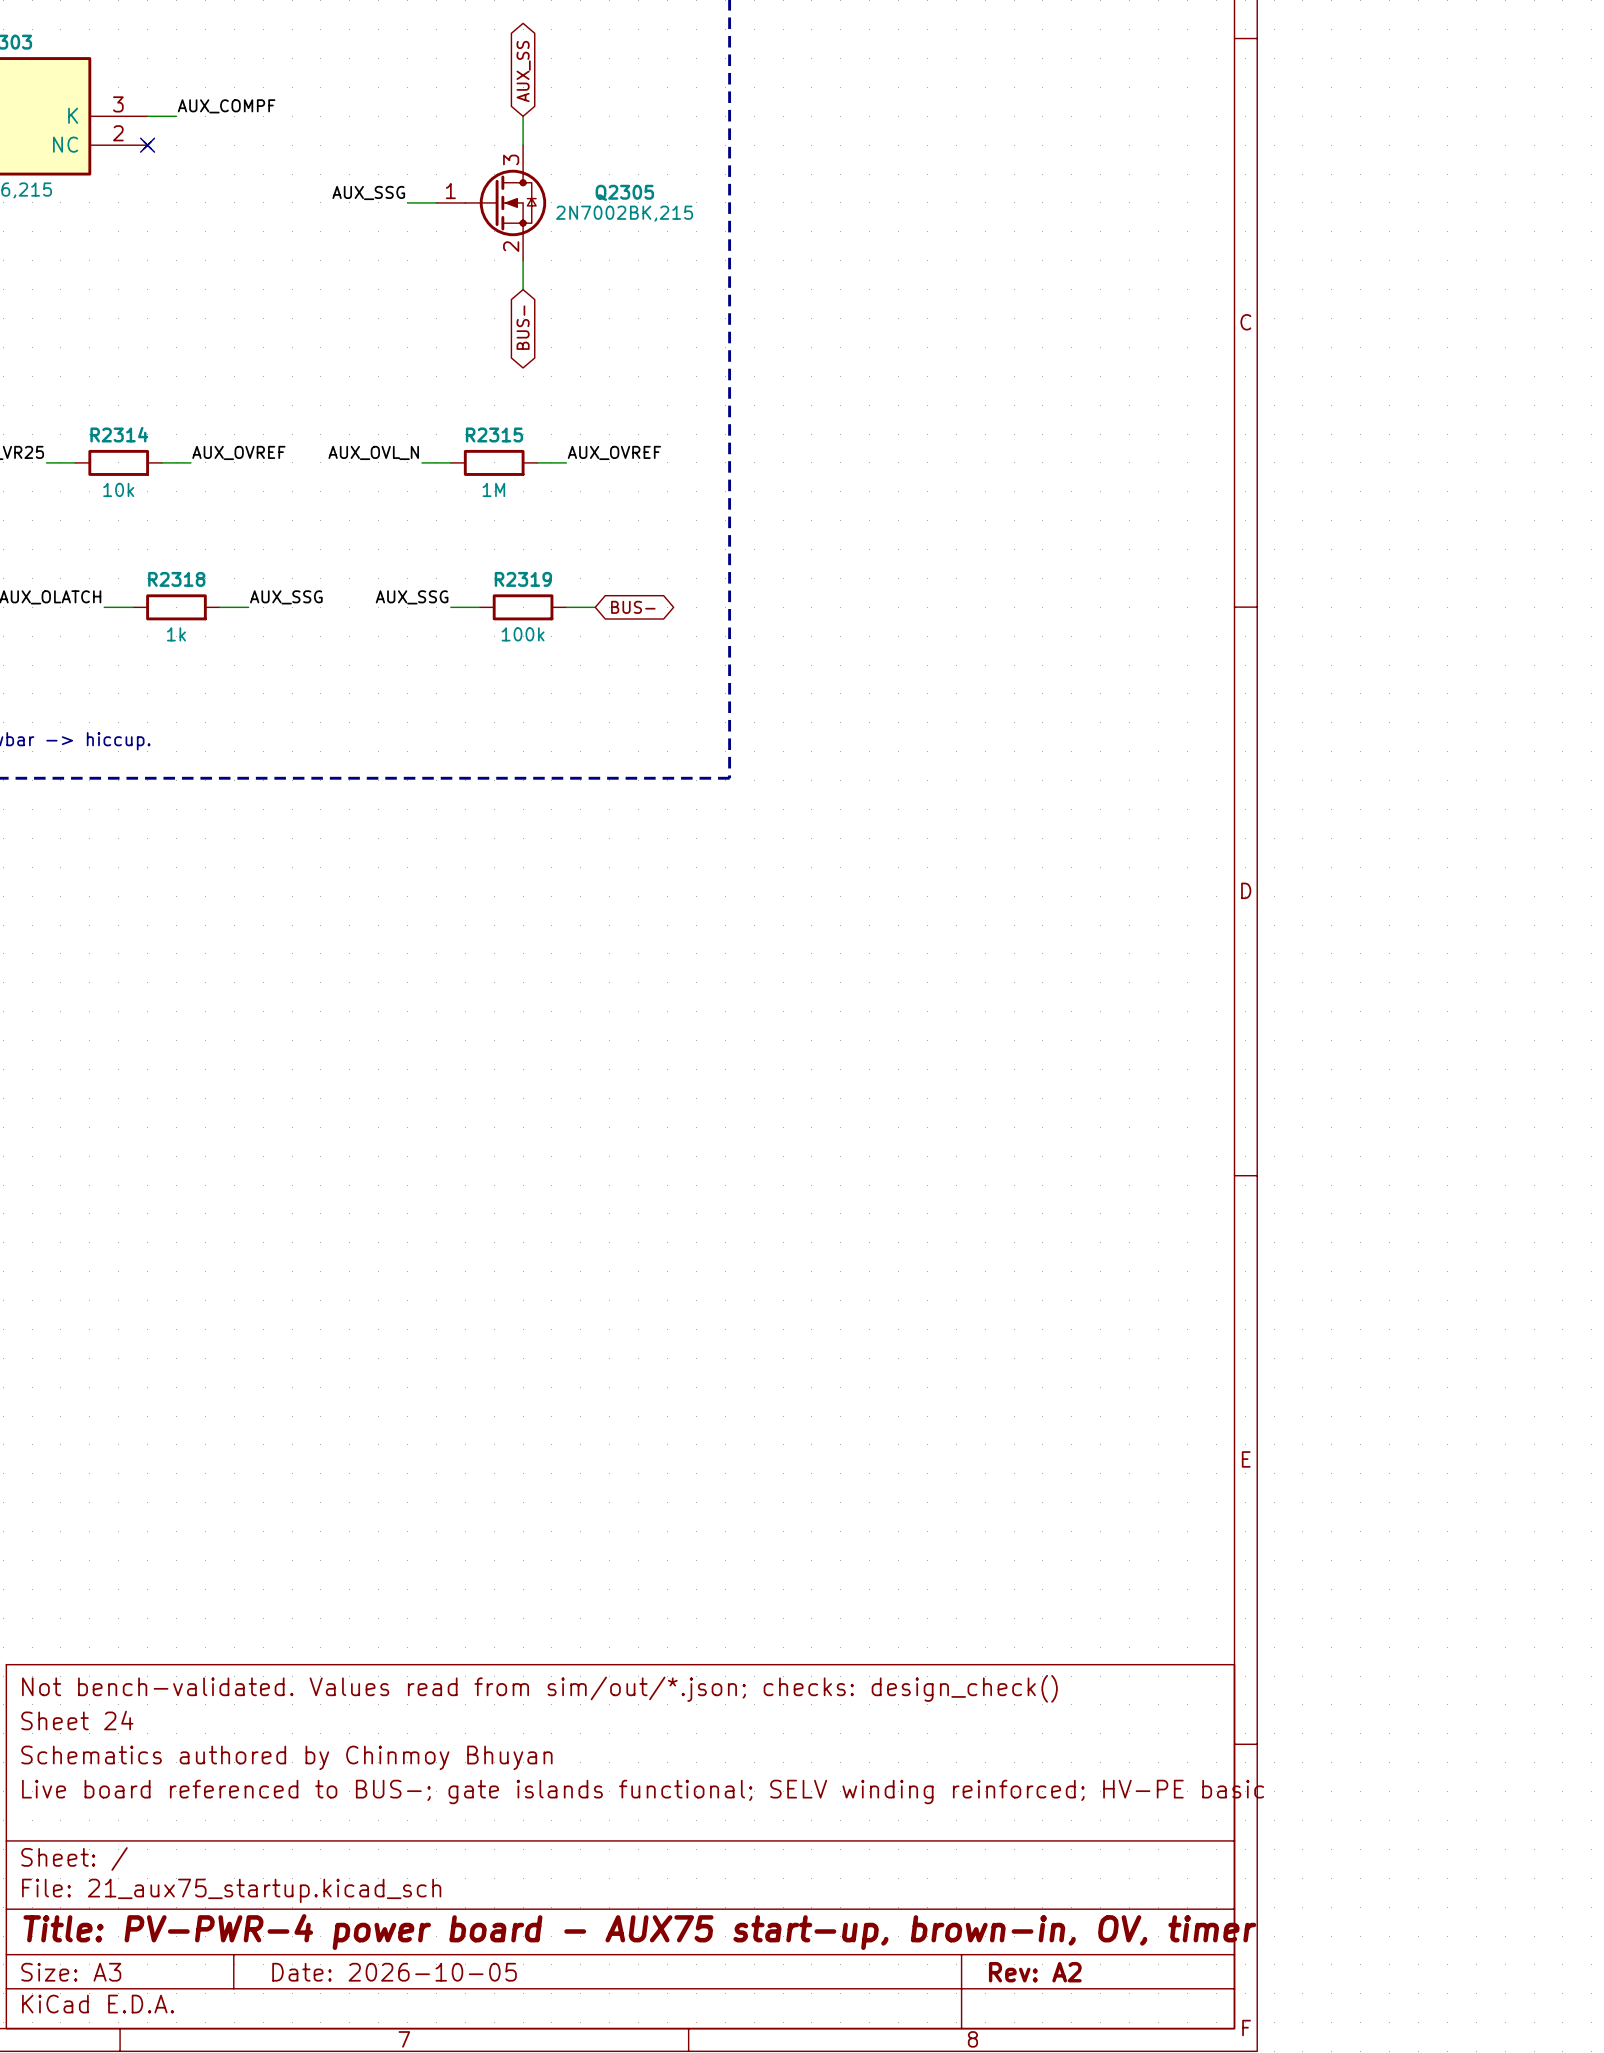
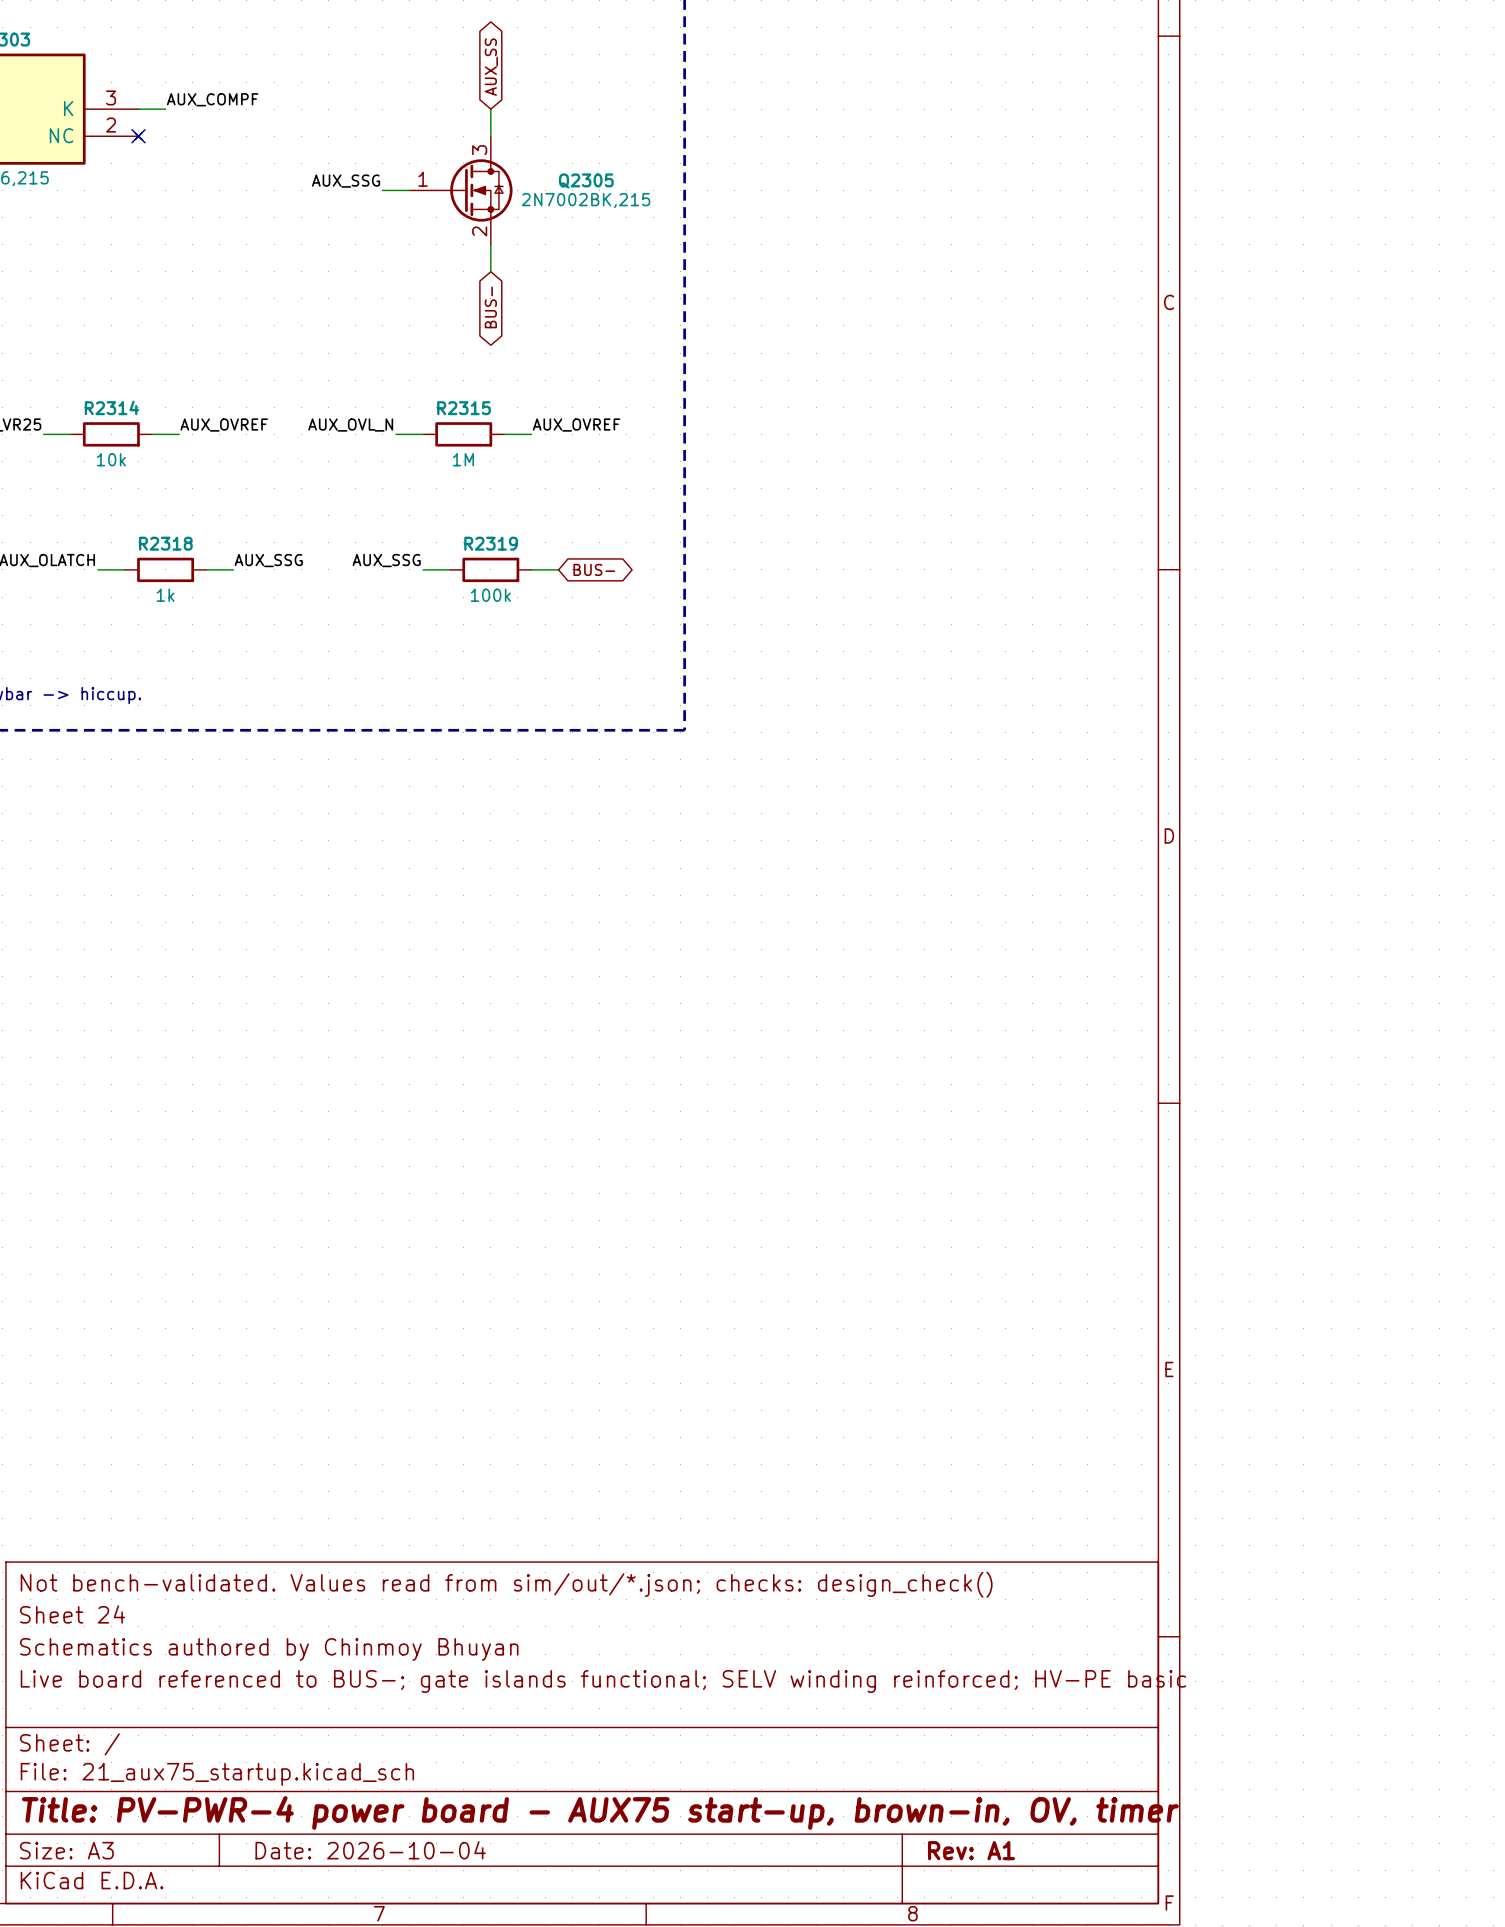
title block: Date: 2026-10-05 (394, 1972) -> Date: 2026-10-04 (370, 1850)
title block: Rev: A2 (1035, 1972) -> Rev: A1 (971, 1850)

